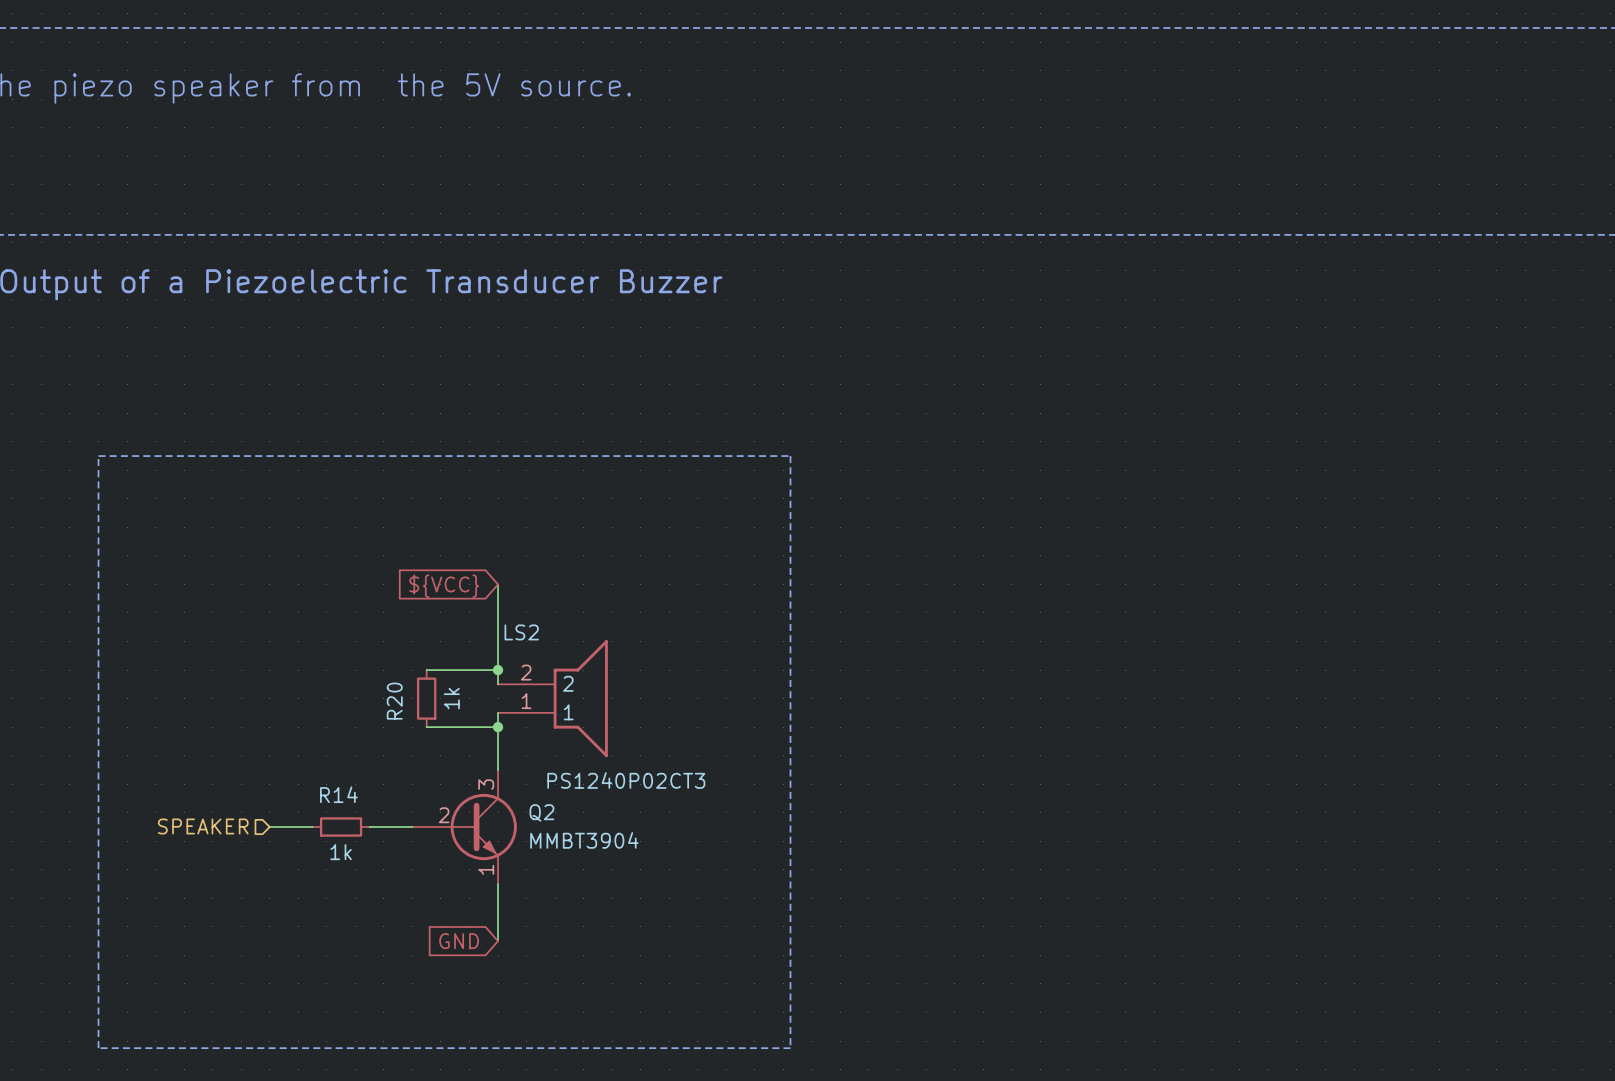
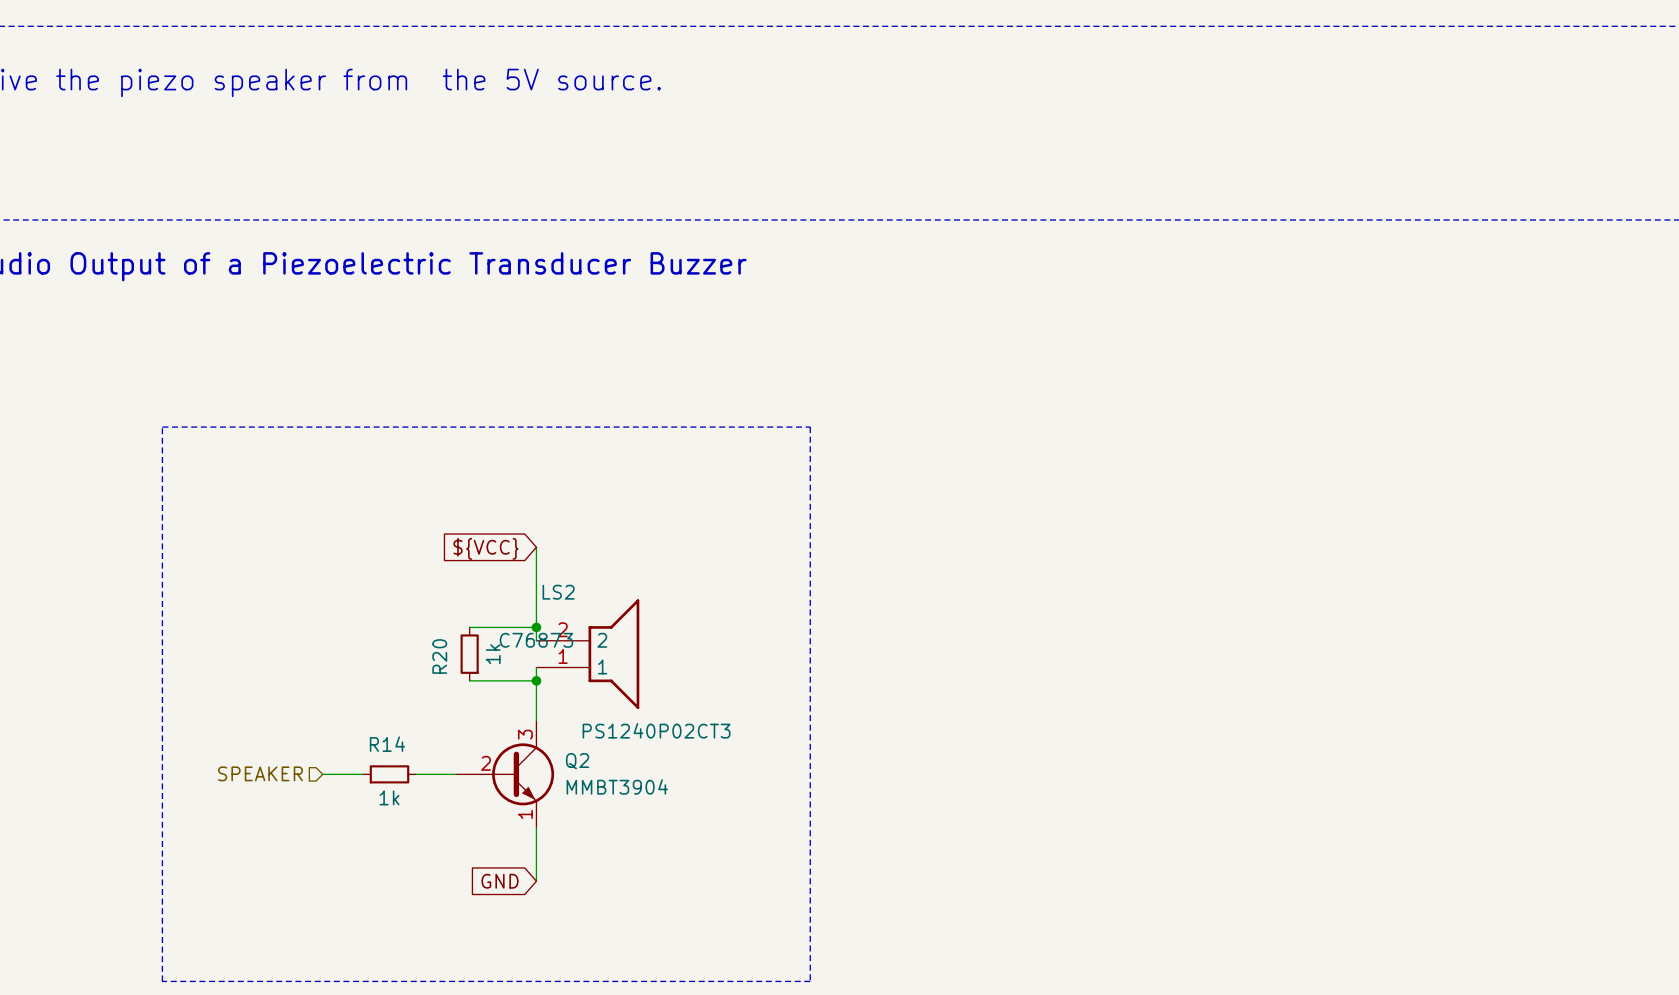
LS2 text: none -> C76873 (536, 640)

